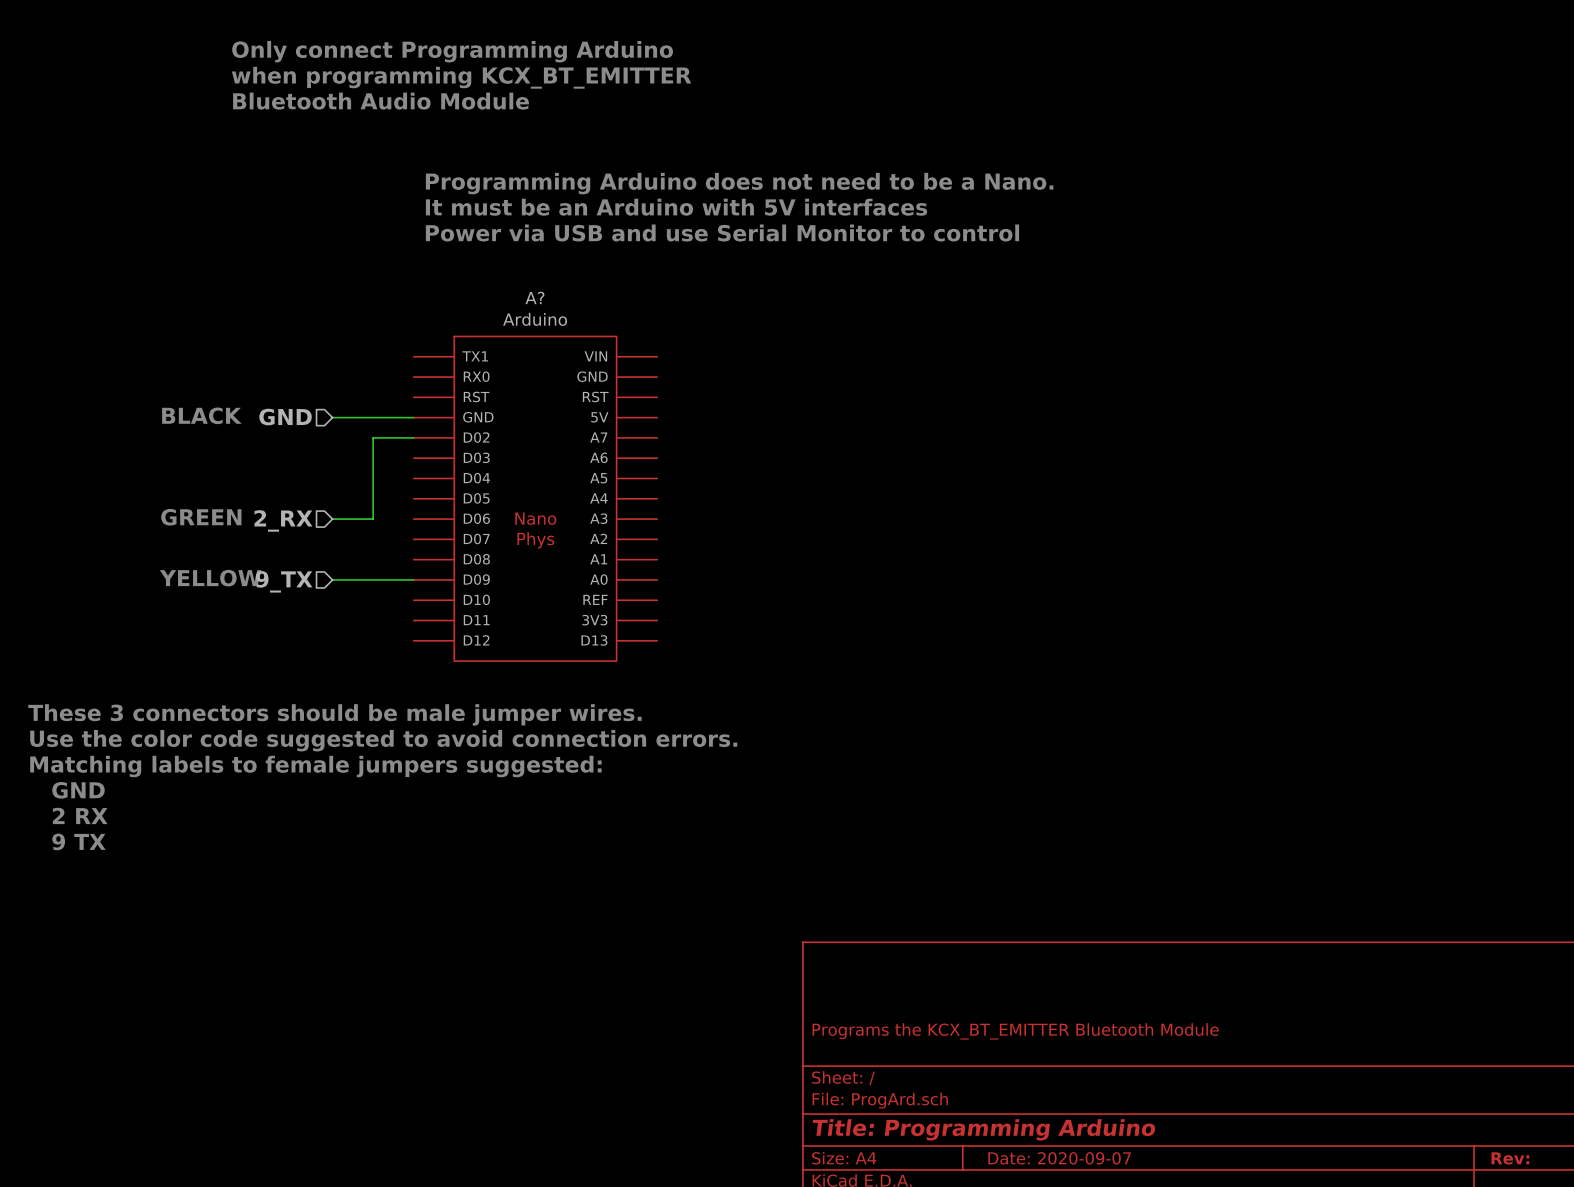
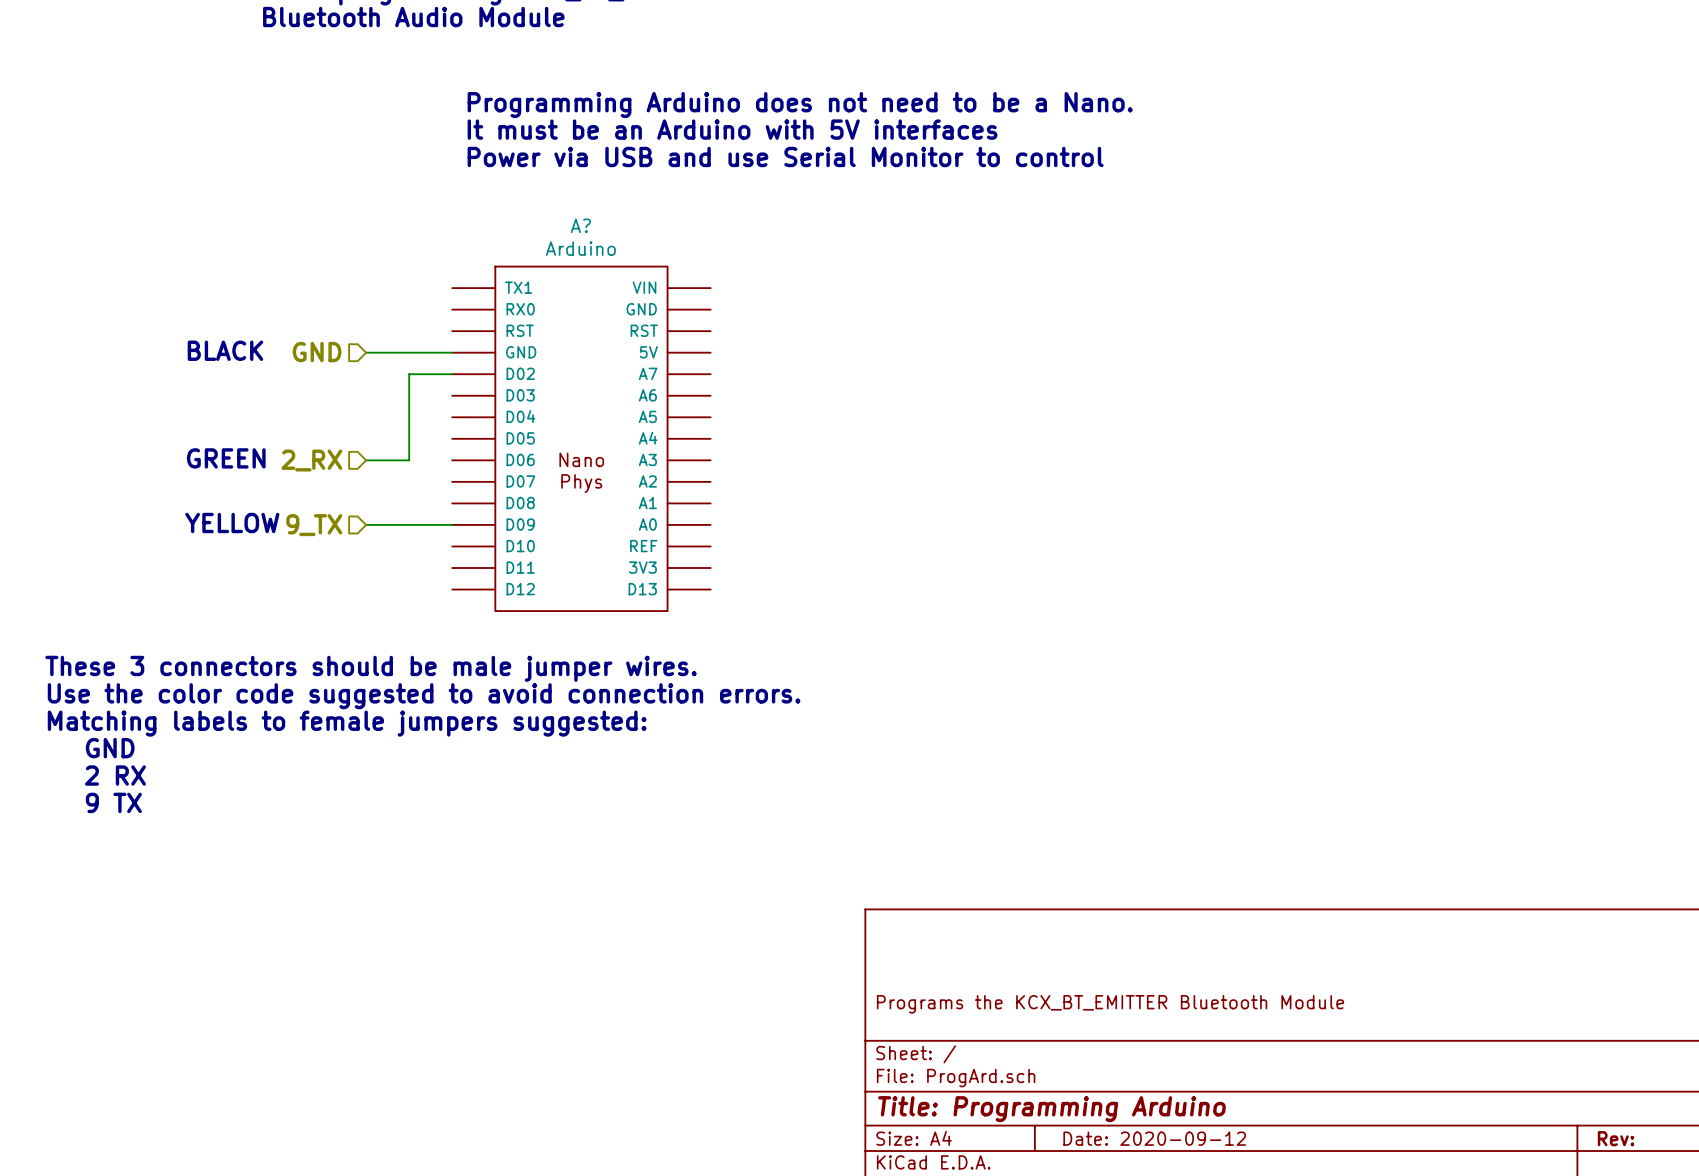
title block: Date: 2020-09-07 (1059, 1158) -> Date: 2020-09-12 (1154, 1138)

